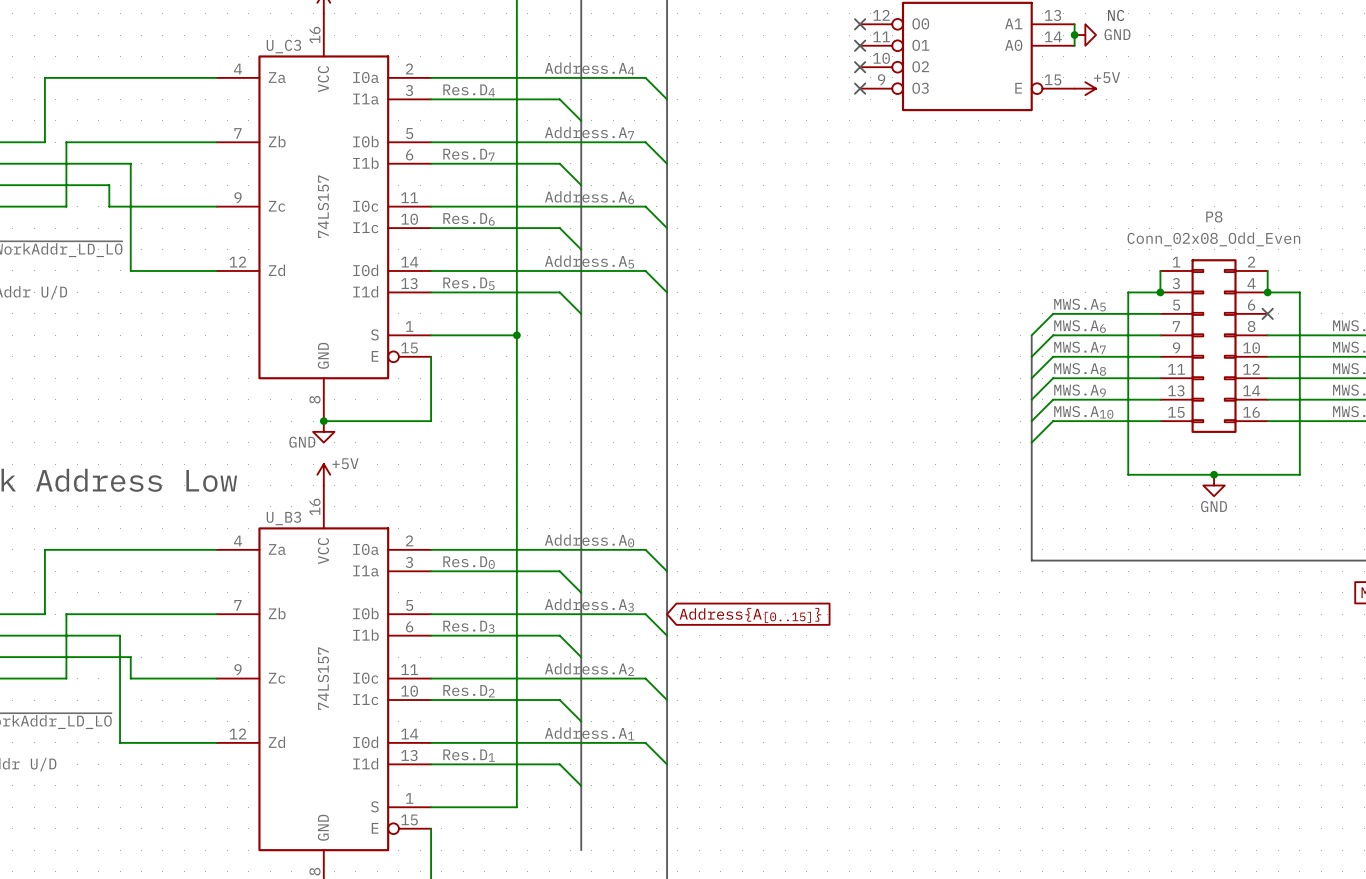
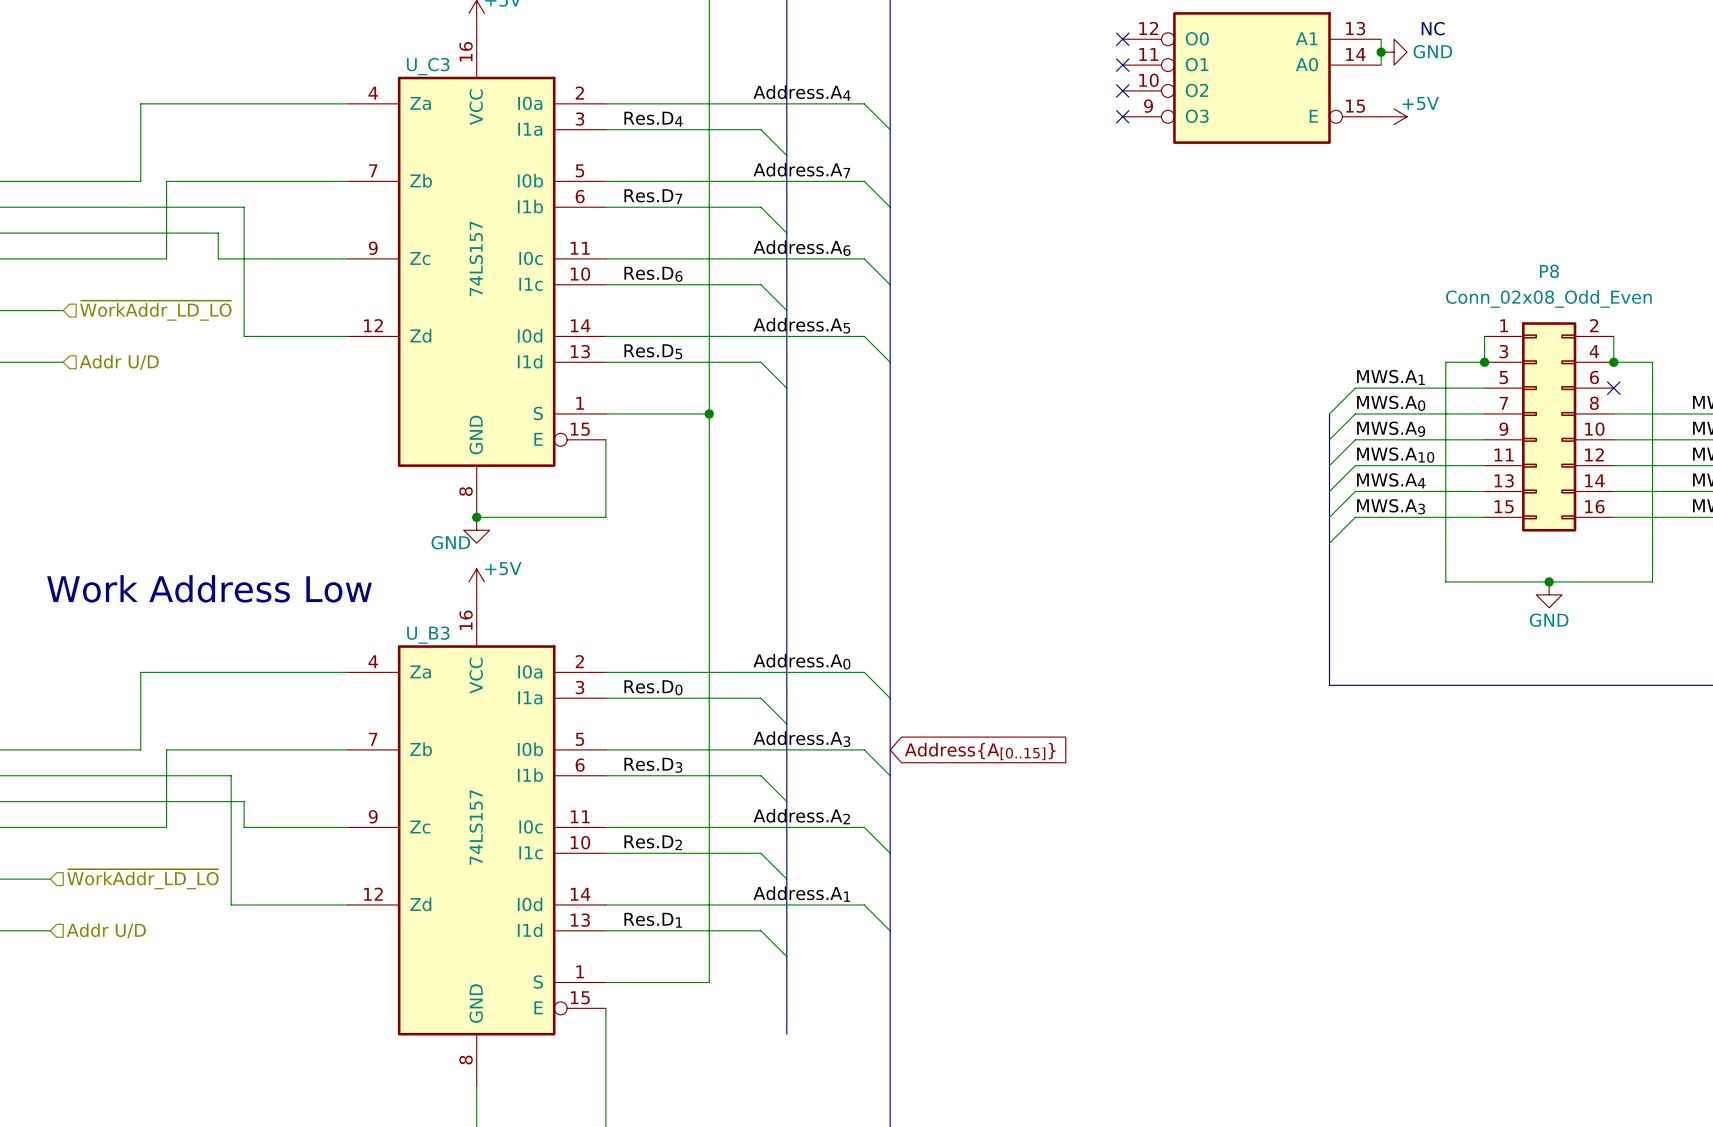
label: MWS.A5 (1080, 305) -> MWS.A1 (1390, 377)
label: MWS.A6 (1080, 326) -> MWS.A0 (1391, 403)
label: MWS.A7 (1079, 347) -> MWS.A9 (1391, 429)
label: MWS.A8 (1080, 369) -> MWS.A10 (1395, 455)
label: MWS.A9 (1080, 390) -> MWS.A4 (1391, 480)
label: MWS.A10 (1083, 412) -> MWS.A3 (1391, 506)

